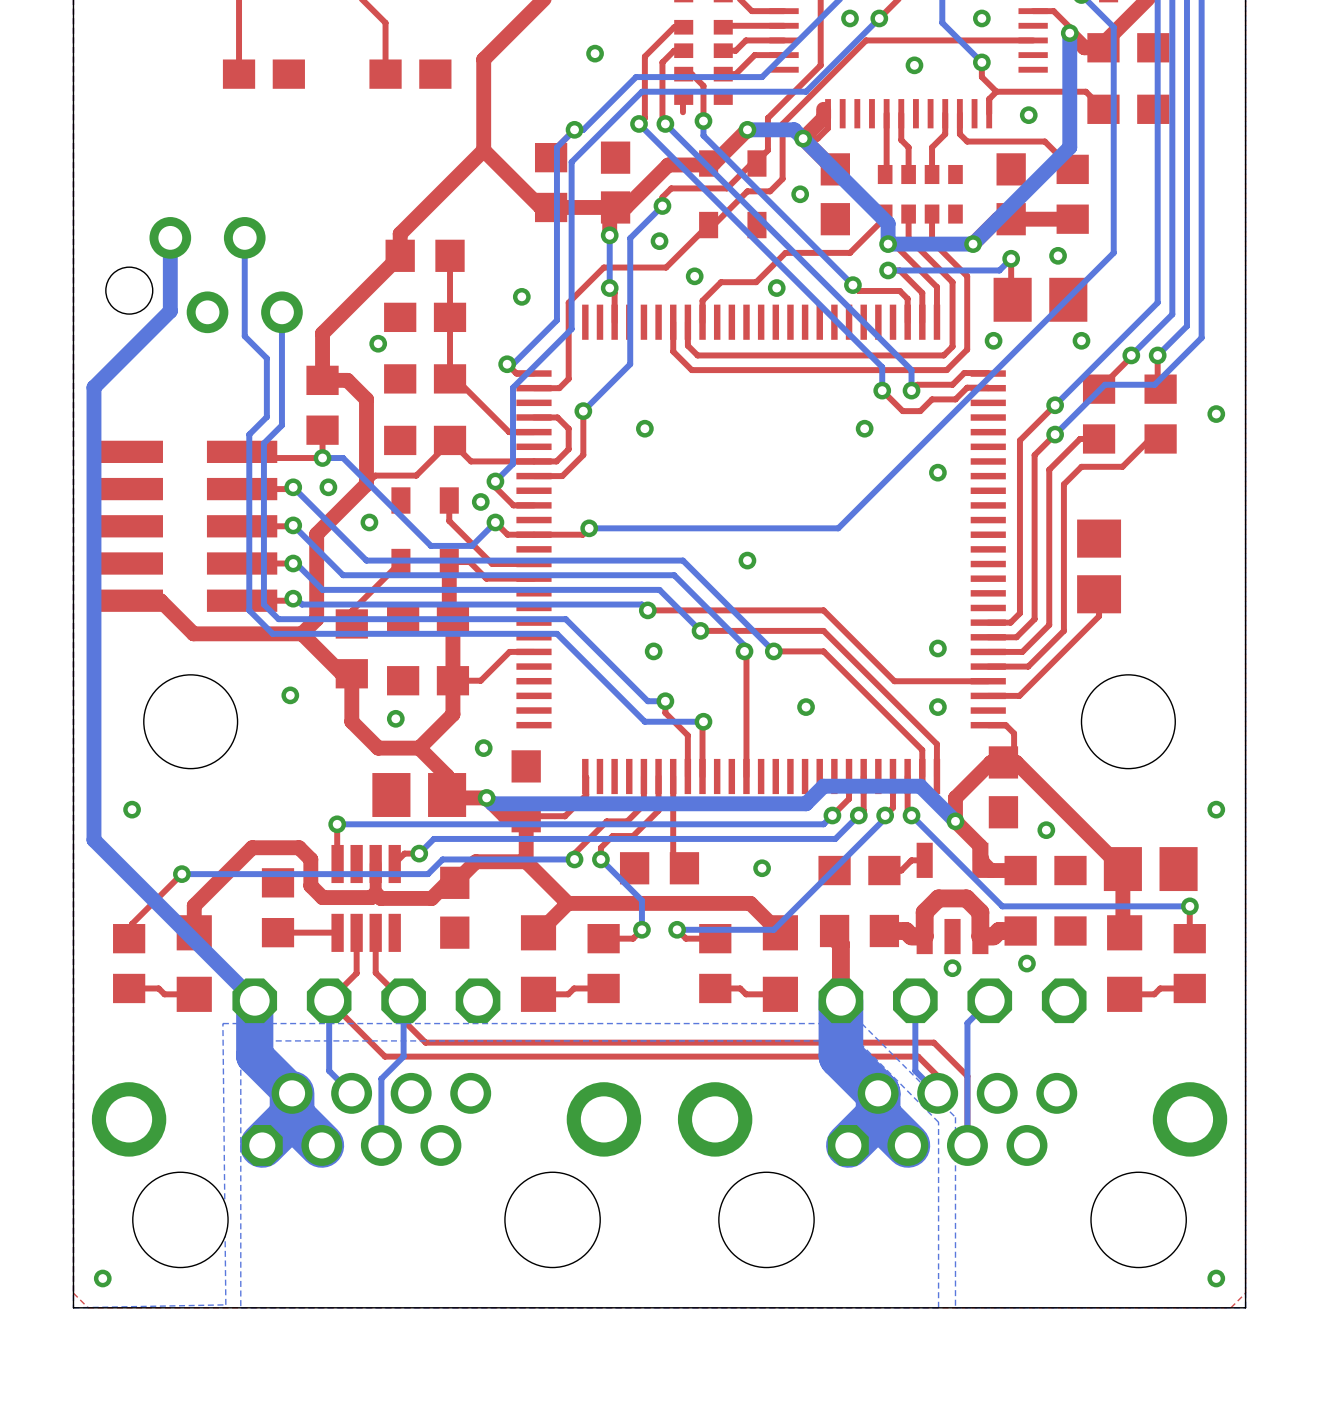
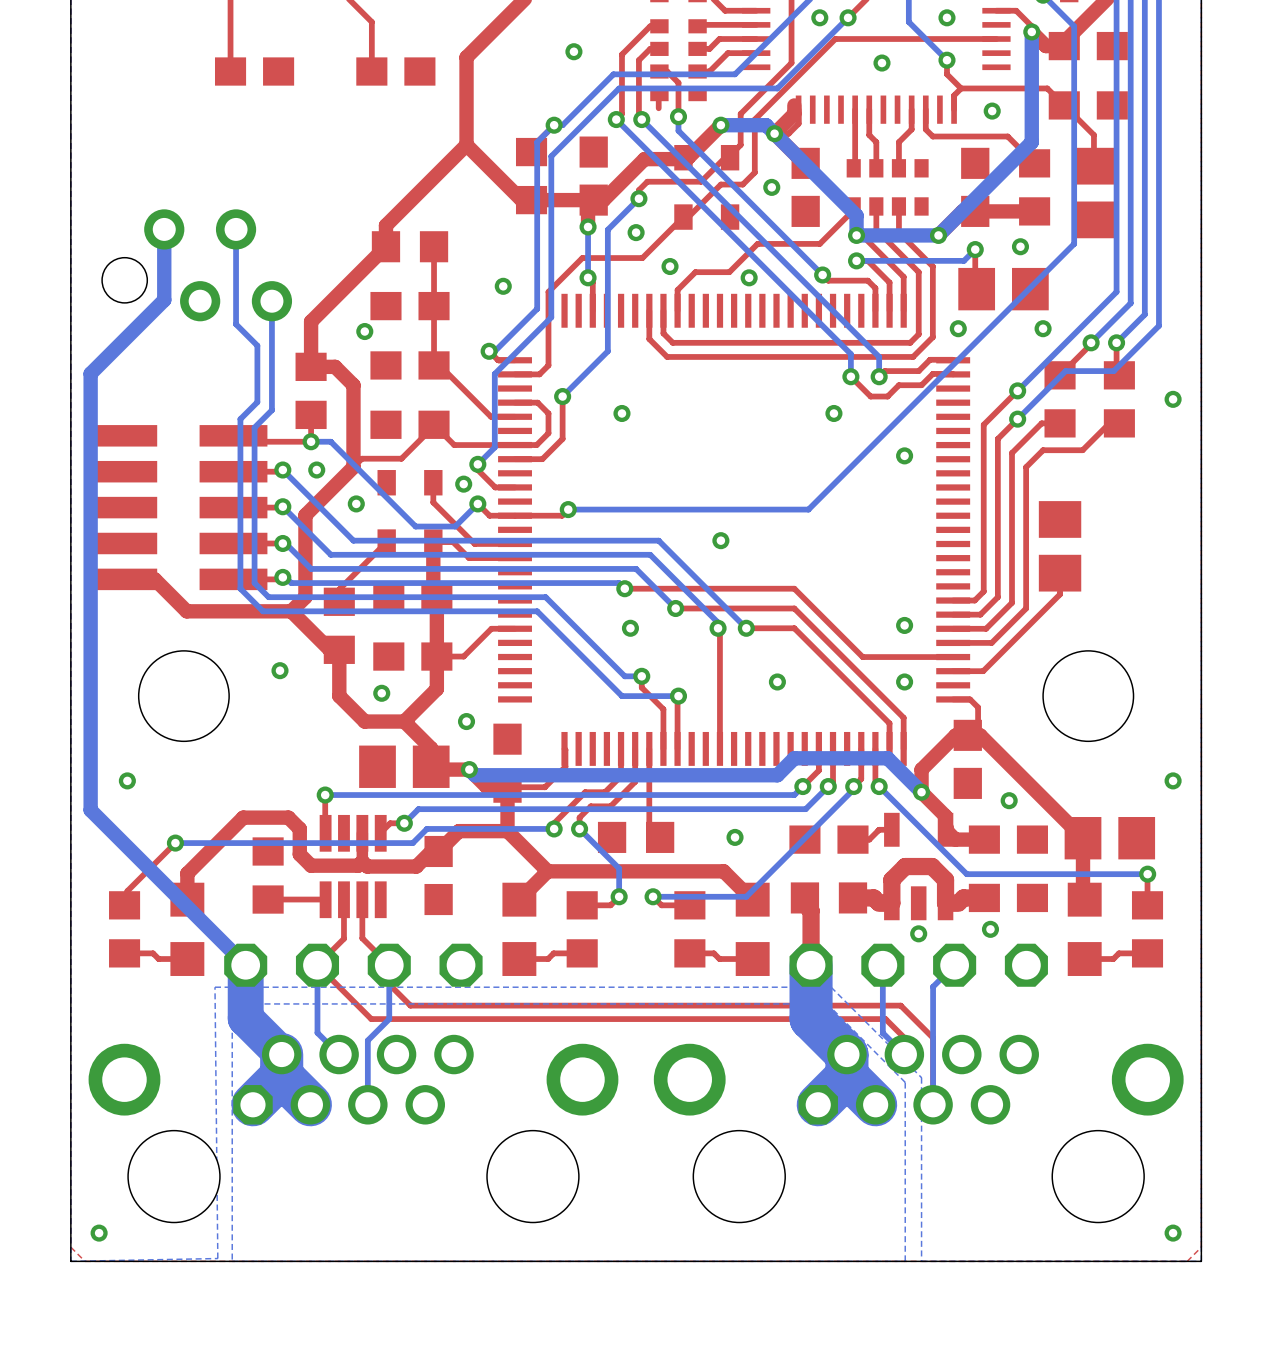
top track: none -> (1064, 105) (1093, 135) (1093, 166)
part: none -> (1093, 193)

